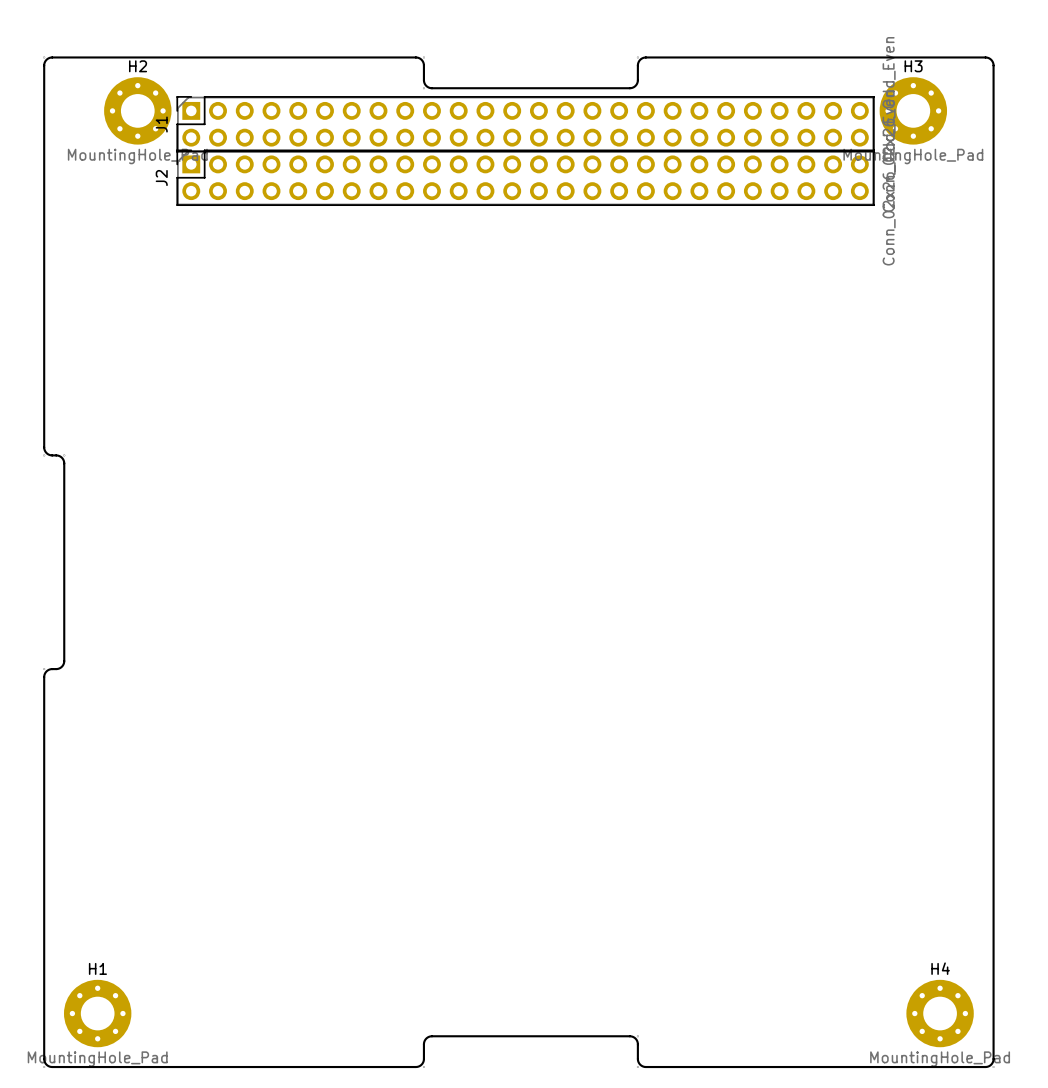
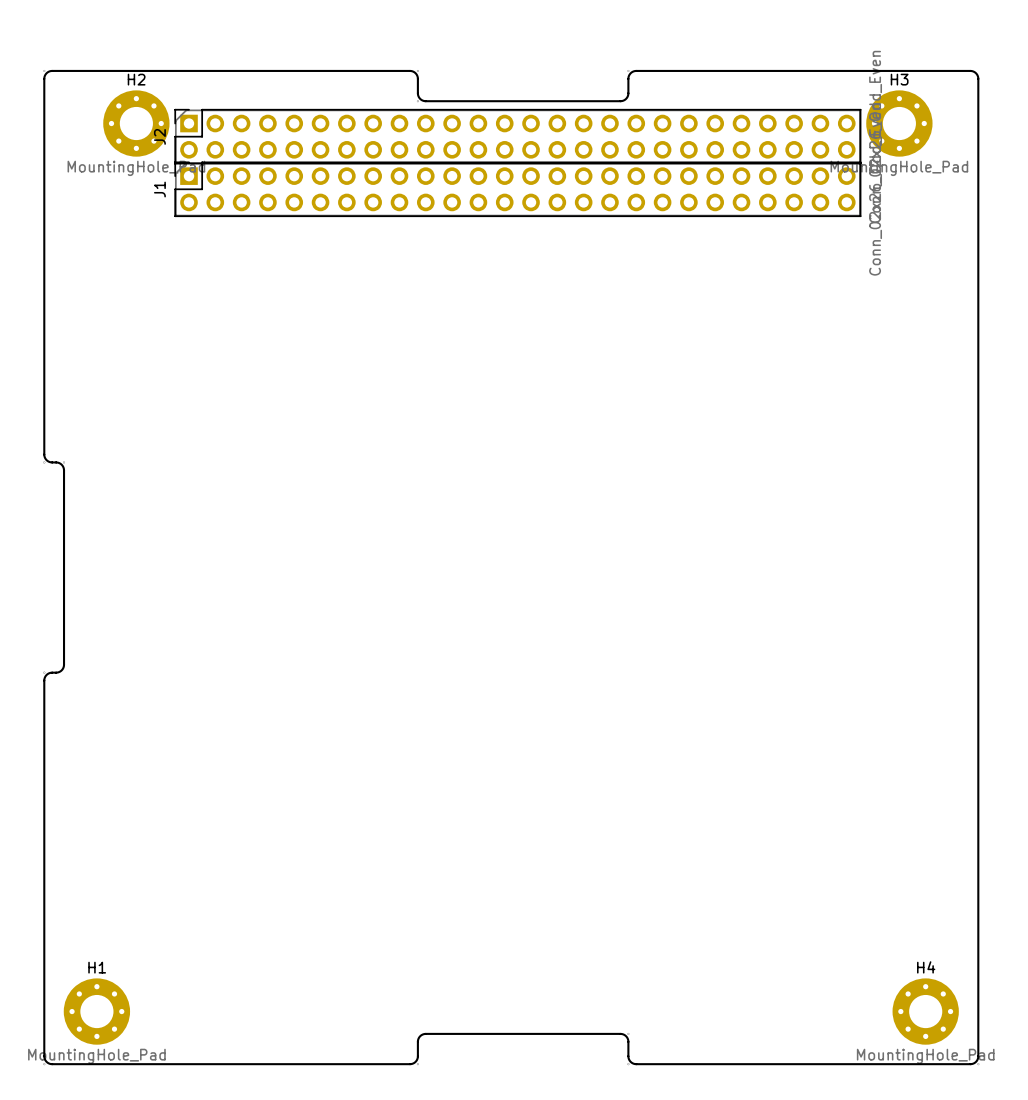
J1 name: J1 (161, 124) -> J2 (159, 136)
J2 name: J2 (161, 178) -> J1 (159, 189)

